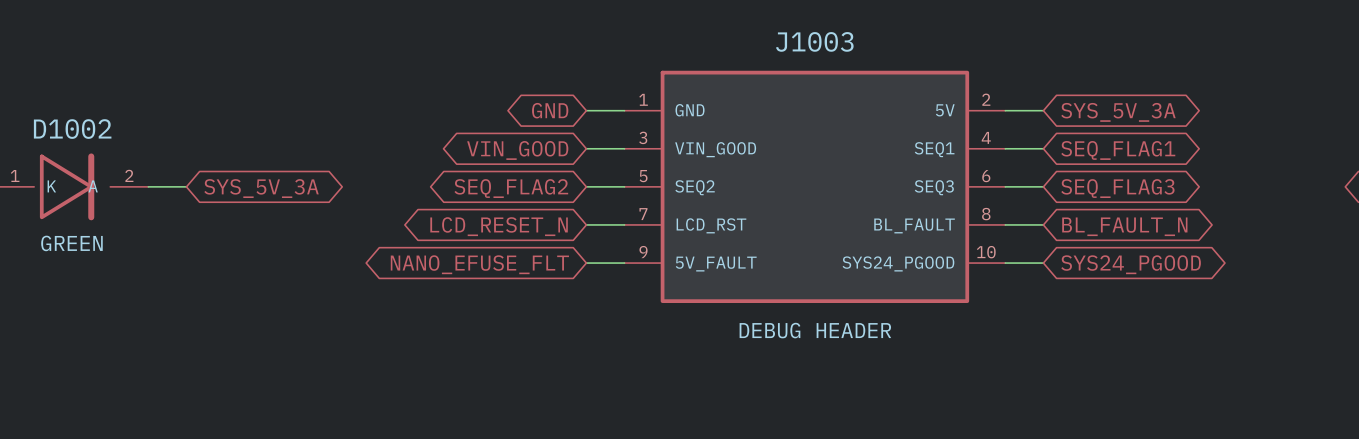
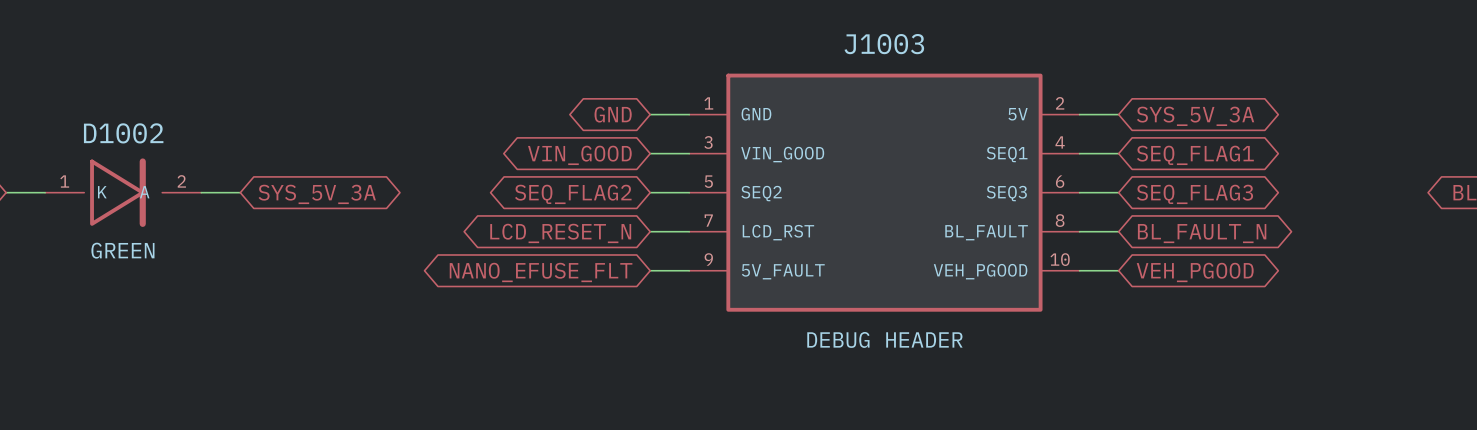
J1003 pin name: SYS24_PGOOD (898, 263) -> VEH_PGOOD (980, 271)
global label: SYS24_PGOOD (1131, 264) -> VEH_PGOOD (1195, 272)

